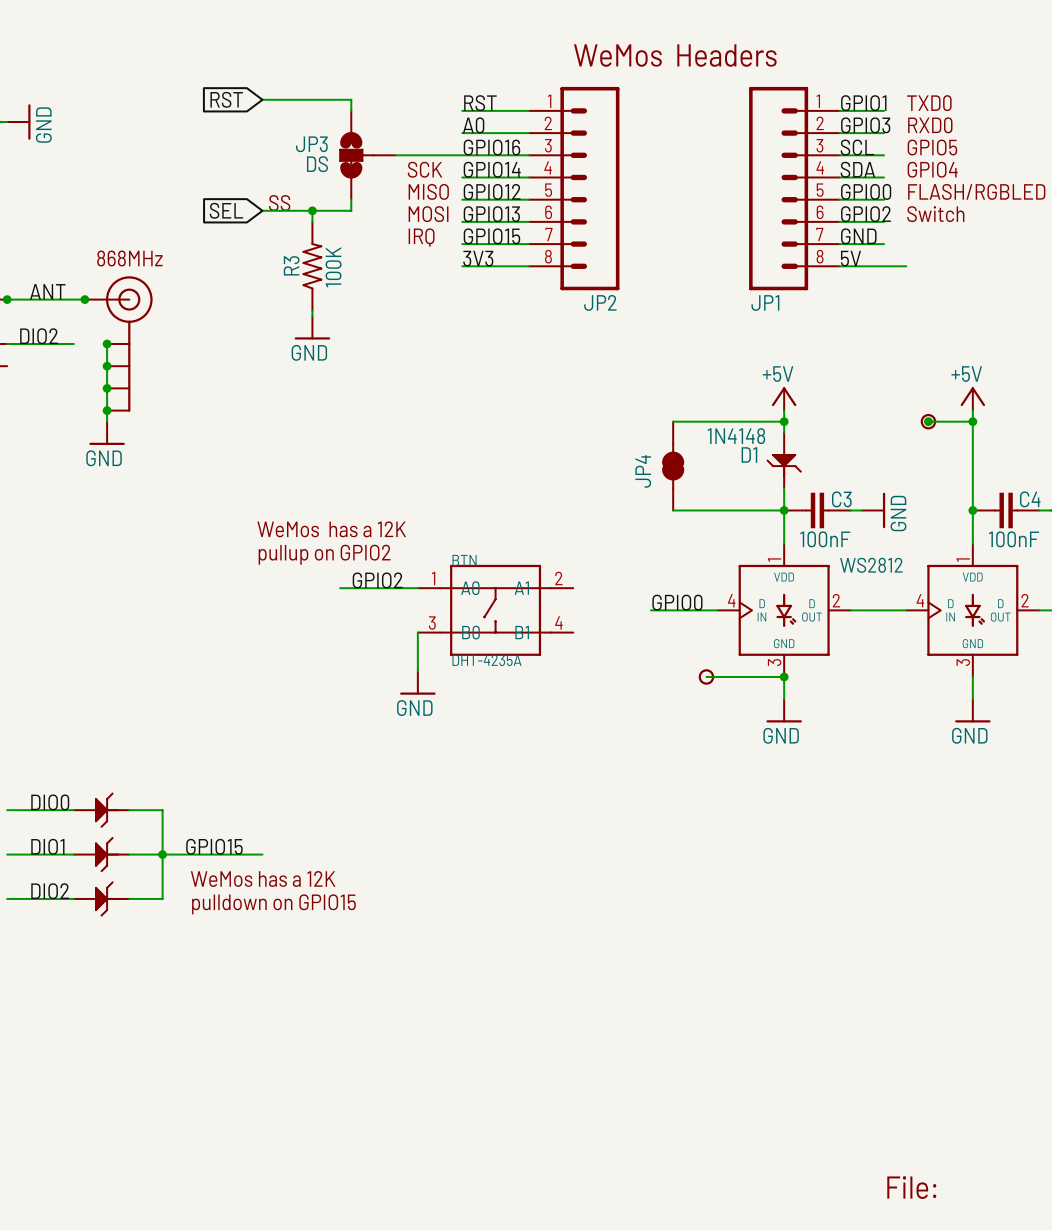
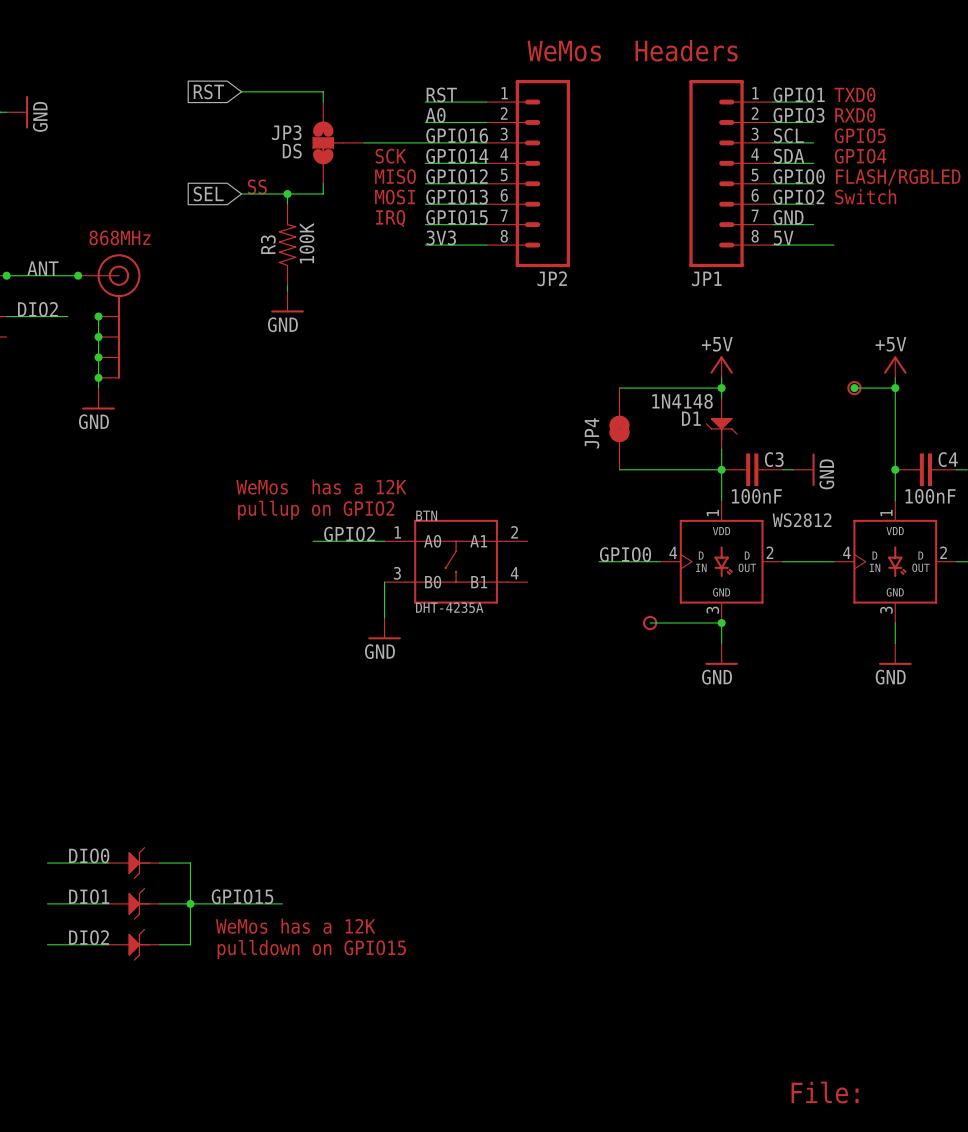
label position: DIO0 (50, 802) -> DIO0 (89, 855)
wire: (7, 810) (73, 810) -> (47, 863) (108, 863)
part: (101, 810) -> none
wire: (129, 810) (162, 810) (162, 898) (129, 898) -> (159, 863) (190, 863) (190, 944) (159, 944)
label position: DIO1 (47, 846) -> DIO1 (89, 896)
label position: GPIO15 (214, 846) -> GPIO15 (242, 896)
wire: (7, 854) (73, 854) -> (47, 903) (108, 903)
part: (101, 854) -> none
wire: (129, 854) (262, 854) -> (159, 903) (282, 903)
junction: (162, 854) -> none
text position: WeMos has a 12K (263, 878) -> WeMos has a 12K (295, 926)
label position: DIO2 (50, 891) -> DIO2 (89, 937)
wire: (7, 898) (73, 898) -> (47, 944) (108, 944)
part: (101, 898) -> none
text position: pulldown on GPIO15 (273, 904) -> pulldown on GPIO15 (311, 949)
part: none -> (134, 863)
part: none -> (134, 903)
junction: none -> (190, 903)
part: none -> (134, 944)

